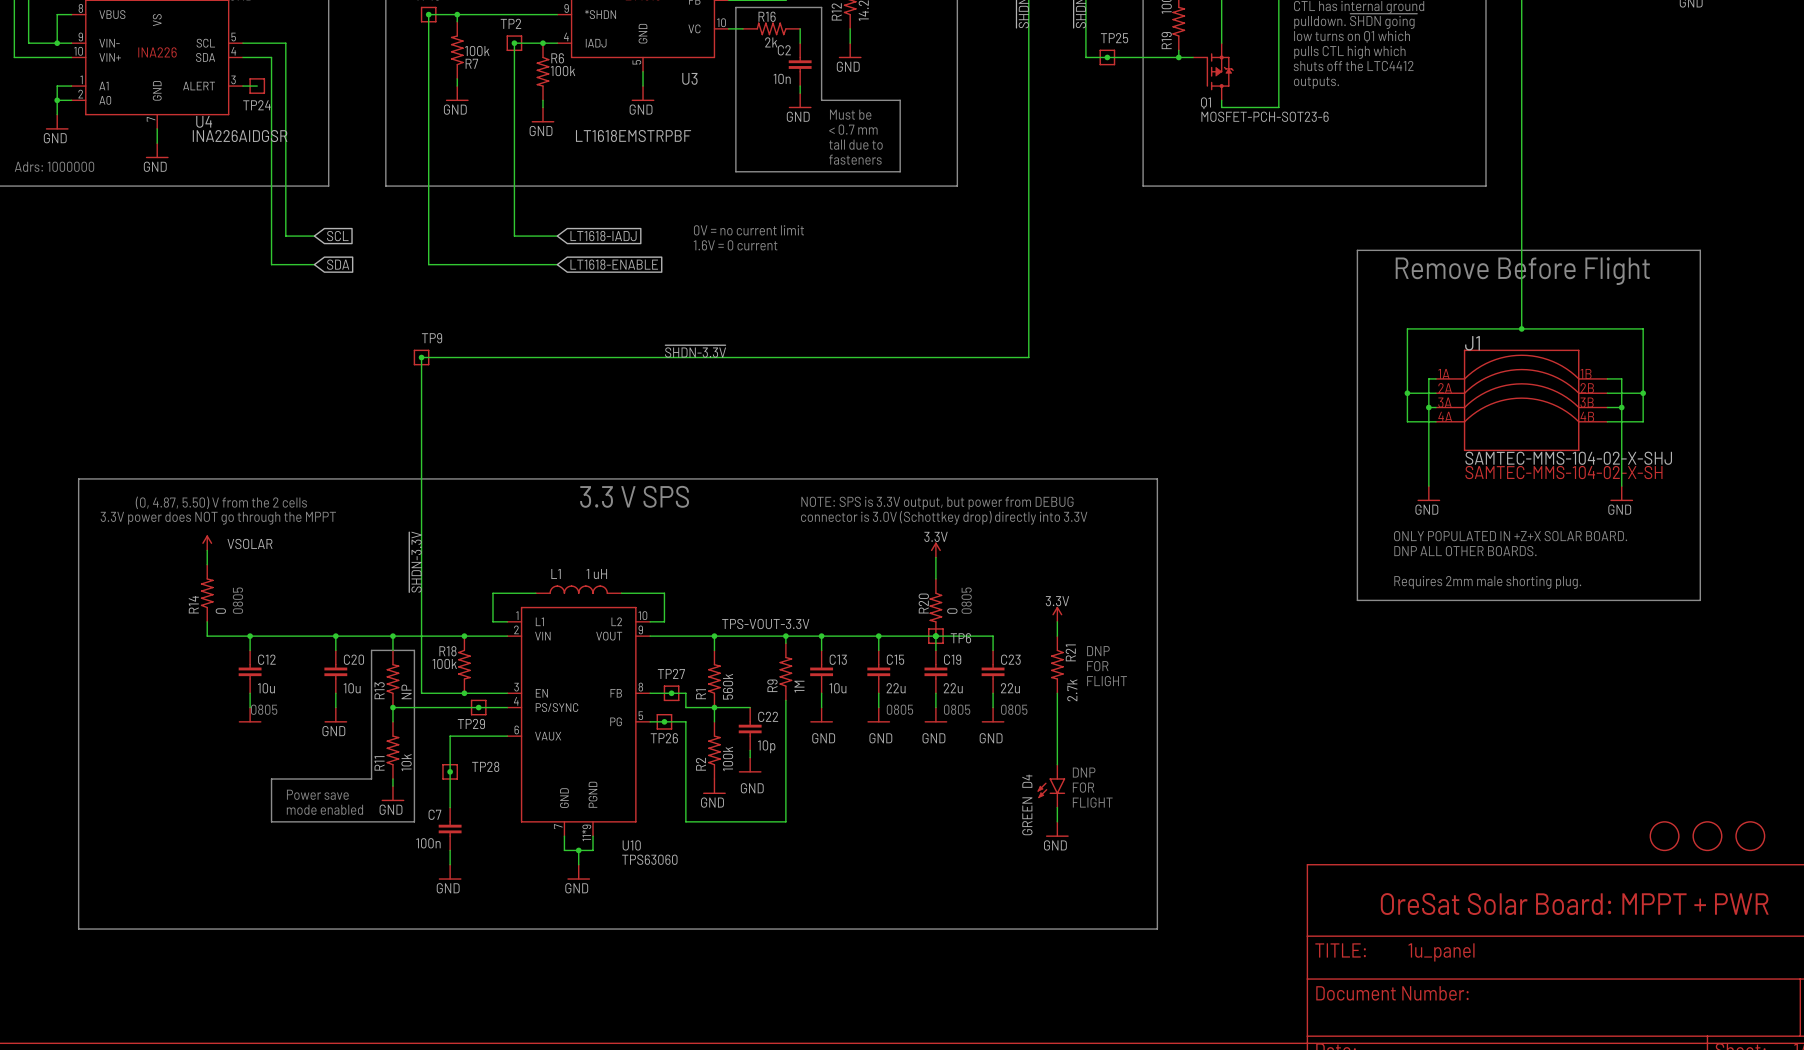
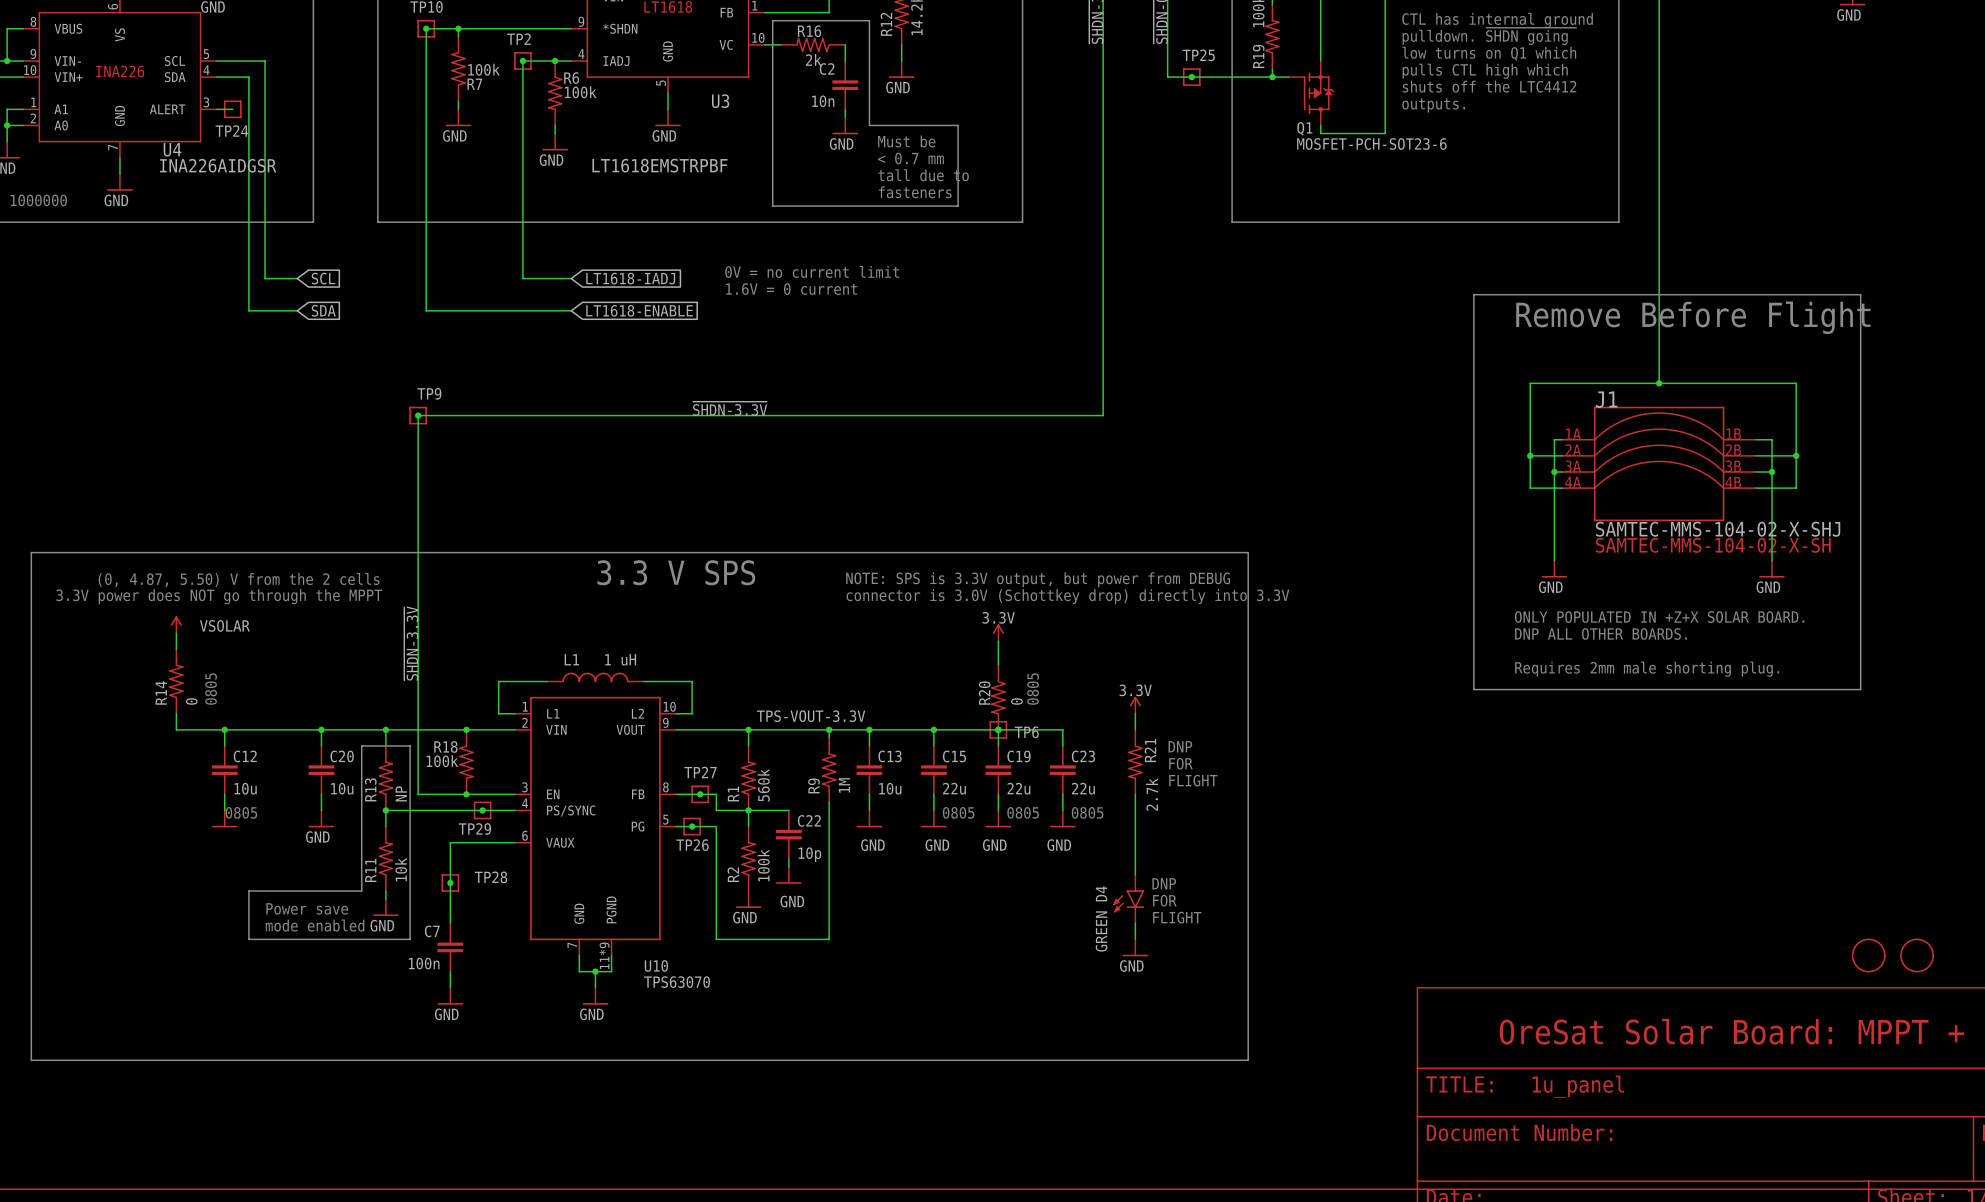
part: (1664, 836) -> none
U10 value: TPS63060 (649, 859) -> TPS63070 (677, 982)

